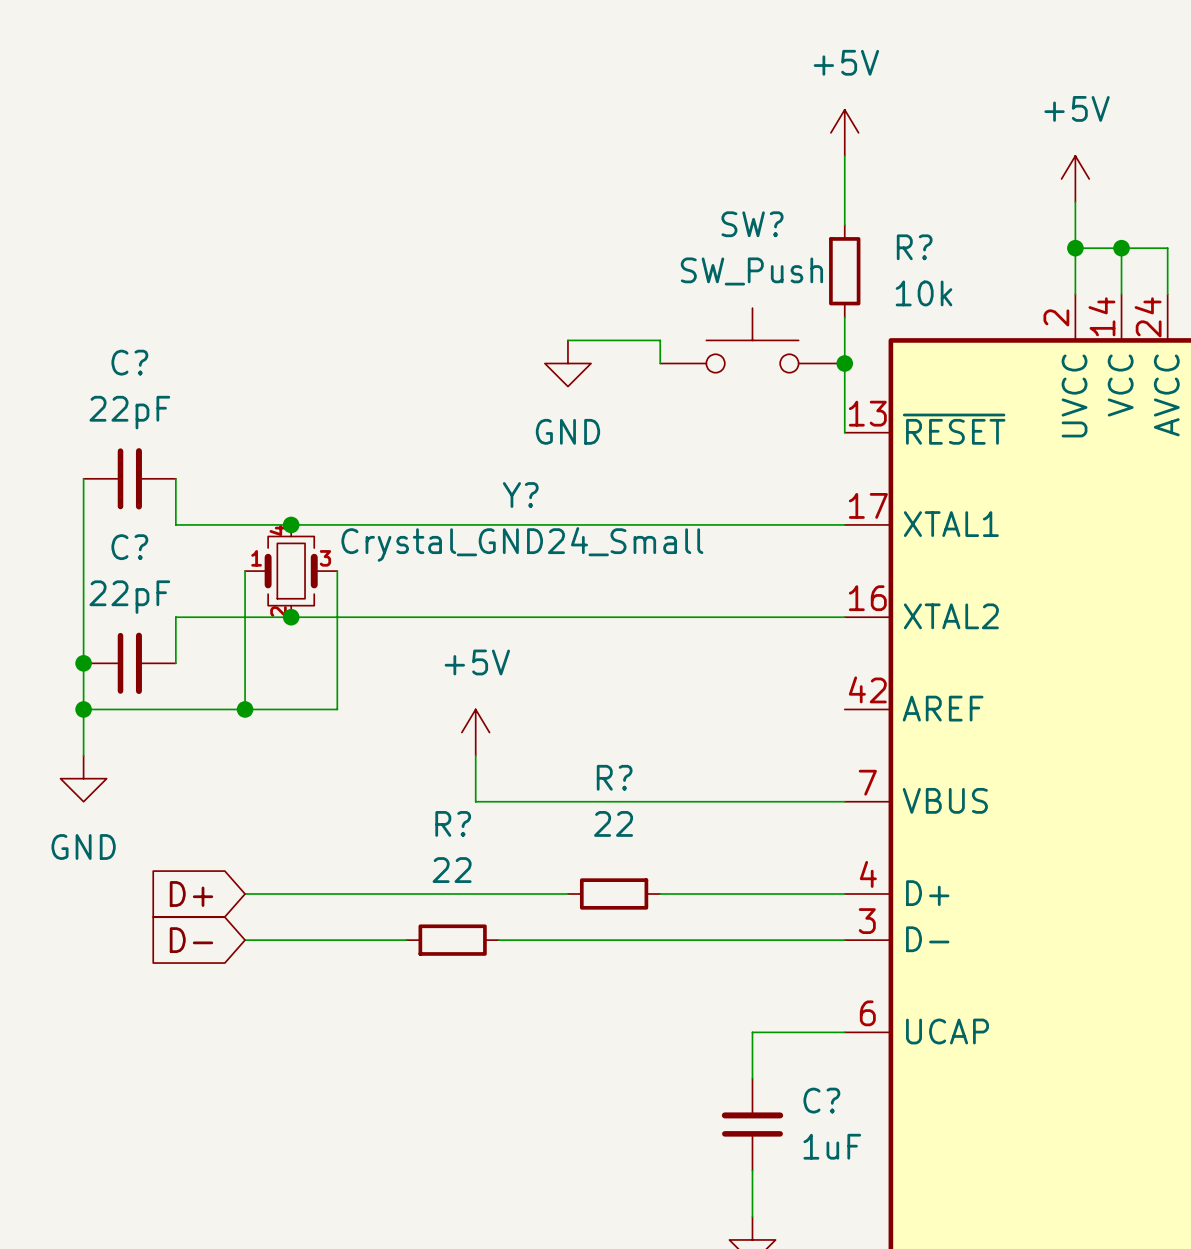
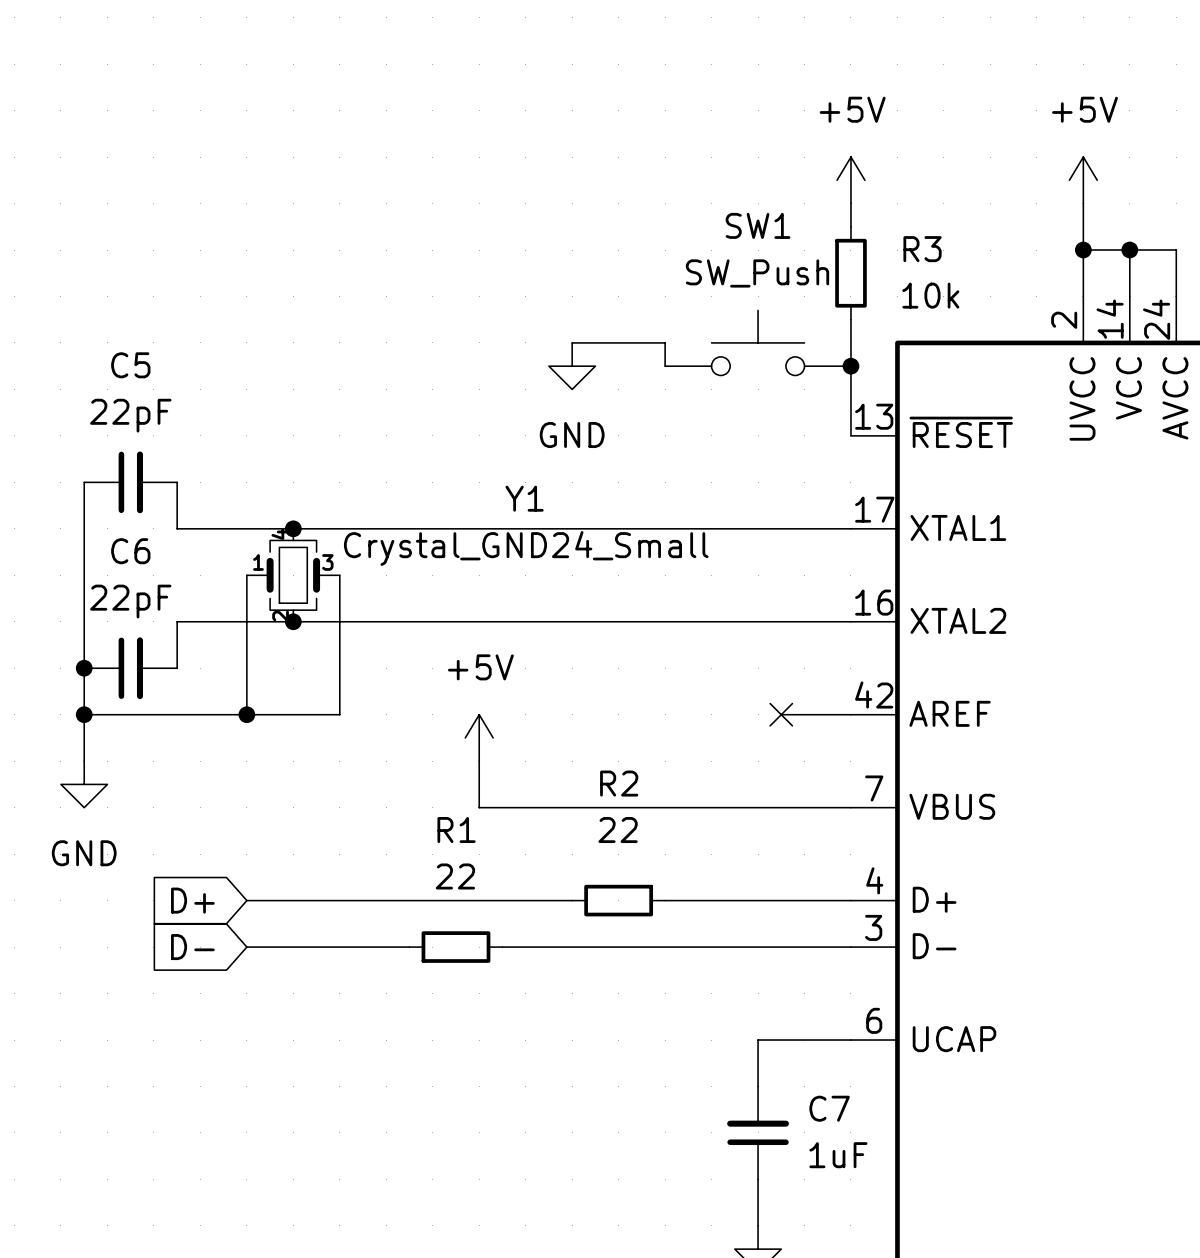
power symbol position: +5V (844, 132) -> +5V (850, 180)
SW? name: SW? (752, 224) -> SW1 (758, 225)
R? name: R? (914, 247) -> R3 (922, 249)
C? name: C? (129, 362) -> C5 (130, 365)
Y? name: Y? (520, 495) -> Y1 (524, 498)
C? name: C? (129, 547) -> C6 (130, 551)
wire: none -> (781, 714) (850, 714)
no-connect mark: none -> (781, 714)
R? name: R? (614, 777) -> R2 (619, 783)
R? name: R? (453, 823) -> R1 (456, 830)
C? name: C? (821, 1100) -> C7 (829, 1108)

